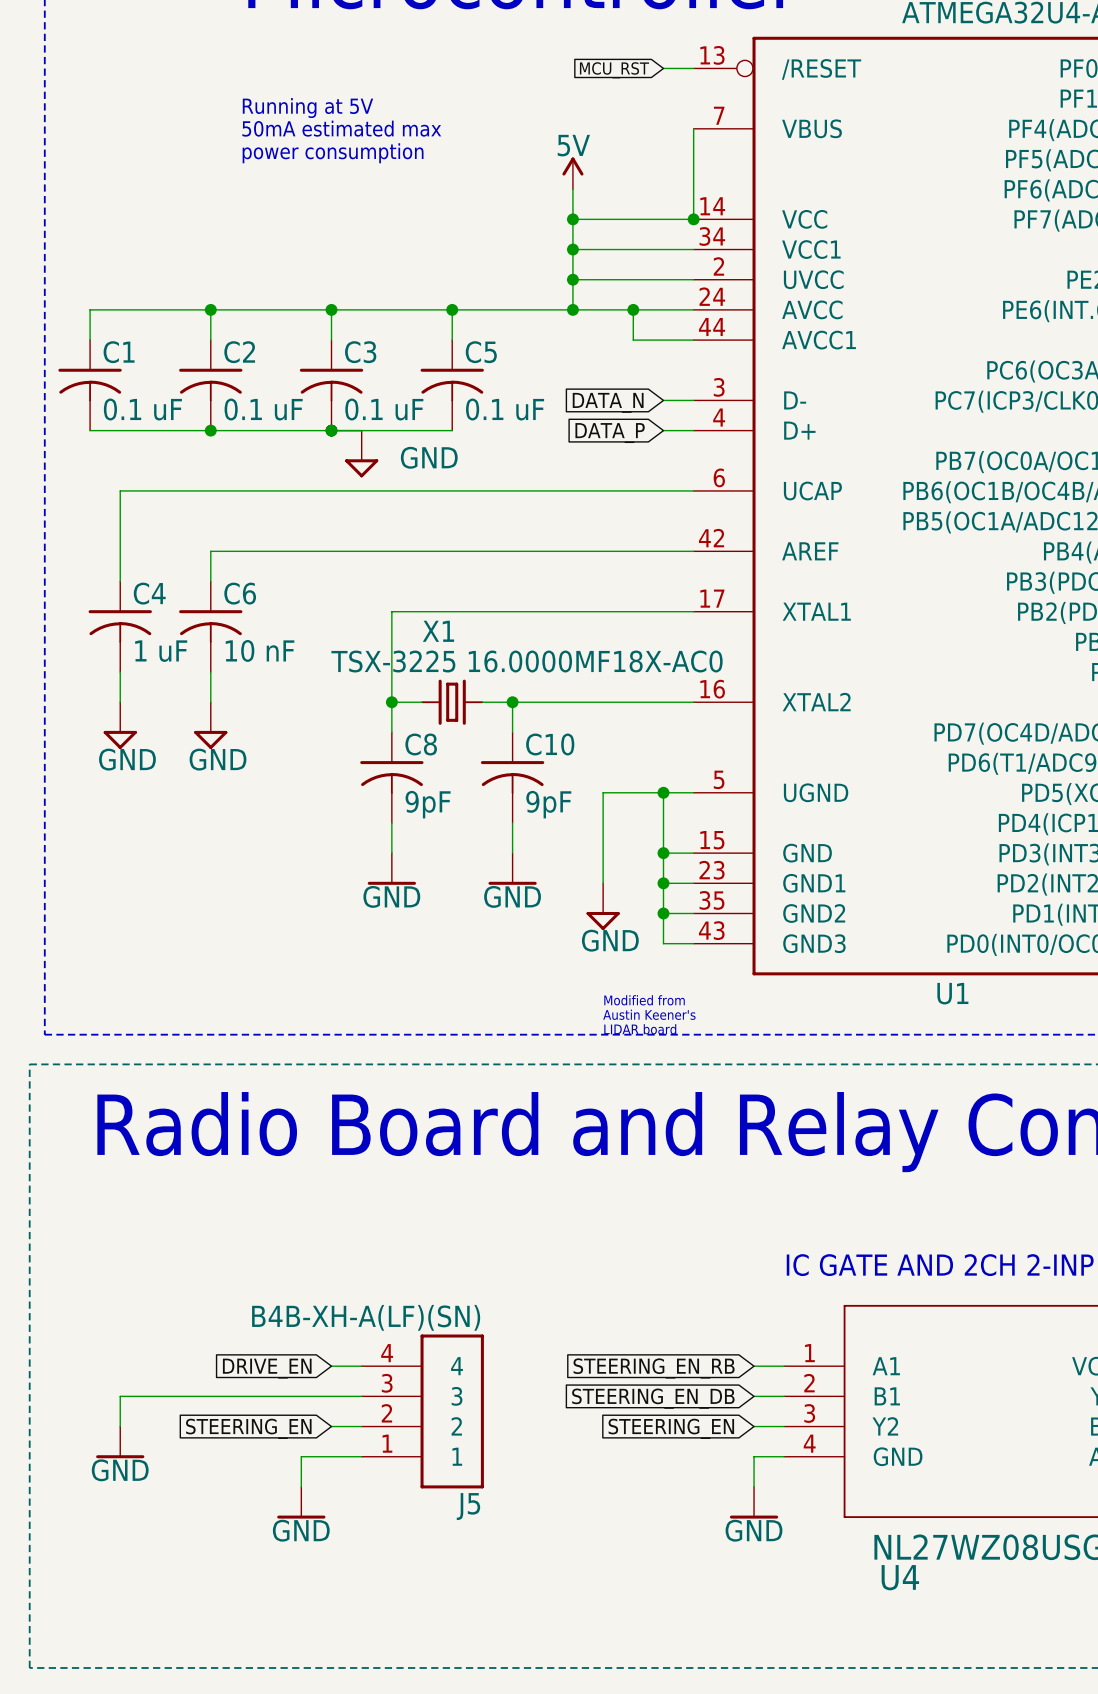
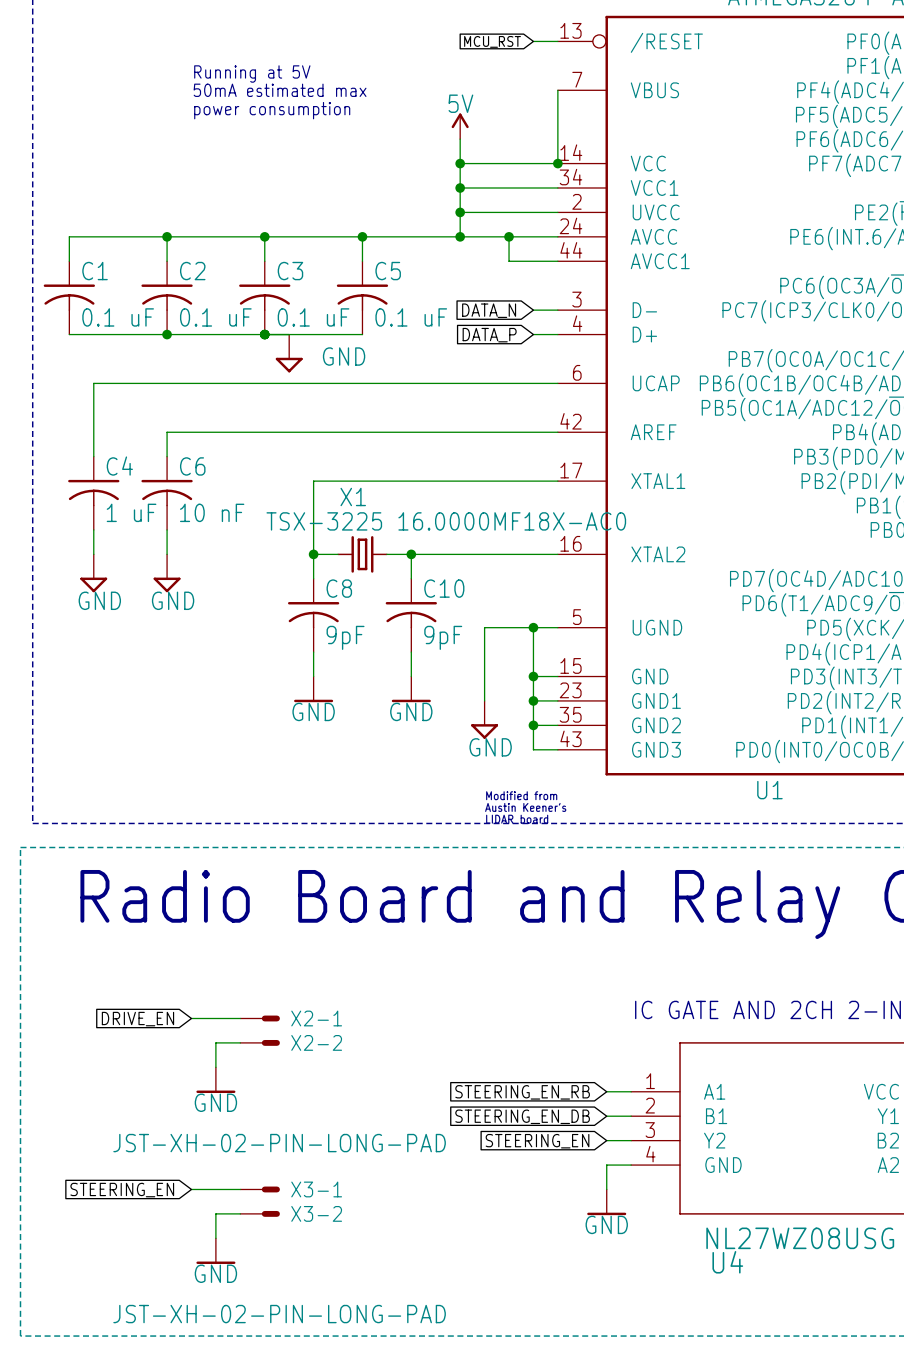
wire: none -> (191, 1018) (240, 1018)
X2-1: none -> JST-XH-02-PIN-LONG-PAD (260, 1018)
wire: none -> (240, 1042) (215, 1042) (215, 1067)
X2-2: none -> (260, 1042)
power symbol: none -> GND (215, 1080)
wire: (331, 1366) (361, 1366) -> none
global label position: DRIVE_EN (267, 1368) -> DRIVE_EN (137, 1019)
wire: (361, 1396) (120, 1396) (120, 1426) -> none
J5: B4B-XH-A(LF)(SN) (422, 1411) -> none
wire: (331, 1426) (361, 1426) -> none
global label position: STEERING_EN (248, 1428) -> STEERING_EN (122, 1190)
power symbol: GND (120, 1442) -> none
wire: (361, 1456) (301, 1456) (301, 1486) -> (191, 1189) (240, 1189)
X3-1: none -> JST-XH-02-PIN-LONG-PAD (260, 1189)
power symbol position: GND (301, 1502) -> GND (215, 1251)
wire: none -> (240, 1213) (215, 1213) (215, 1238)
X3-2: none -> (260, 1213)

